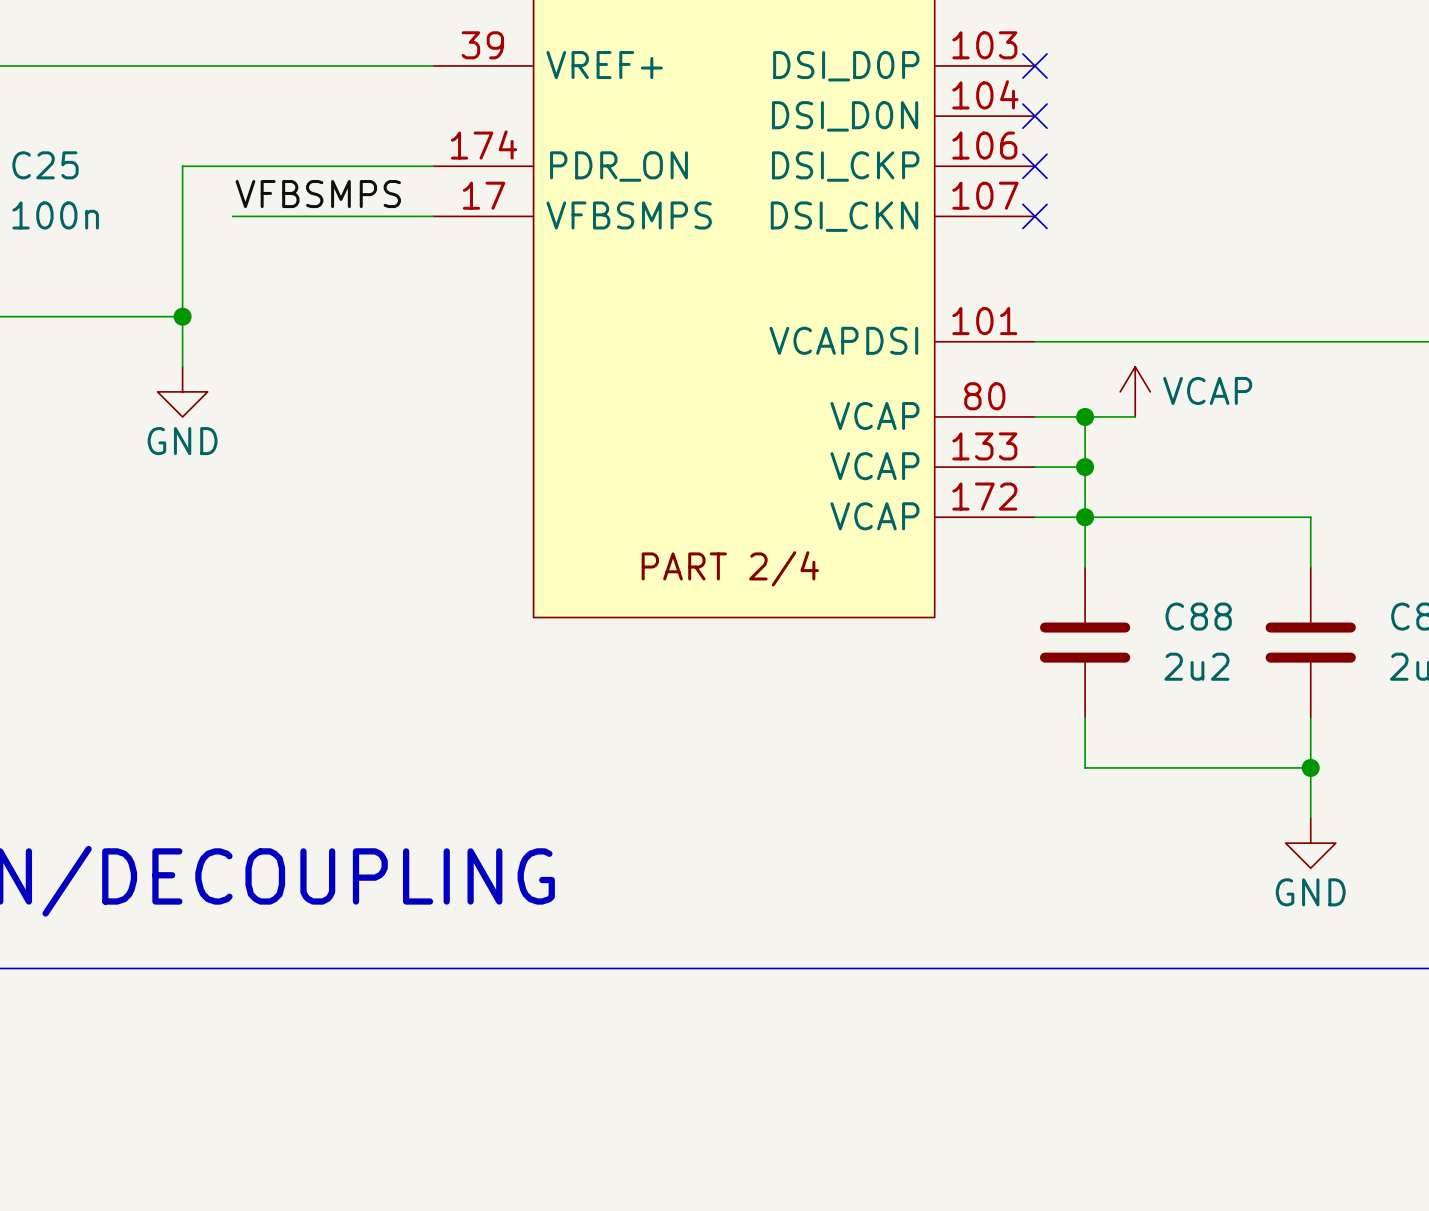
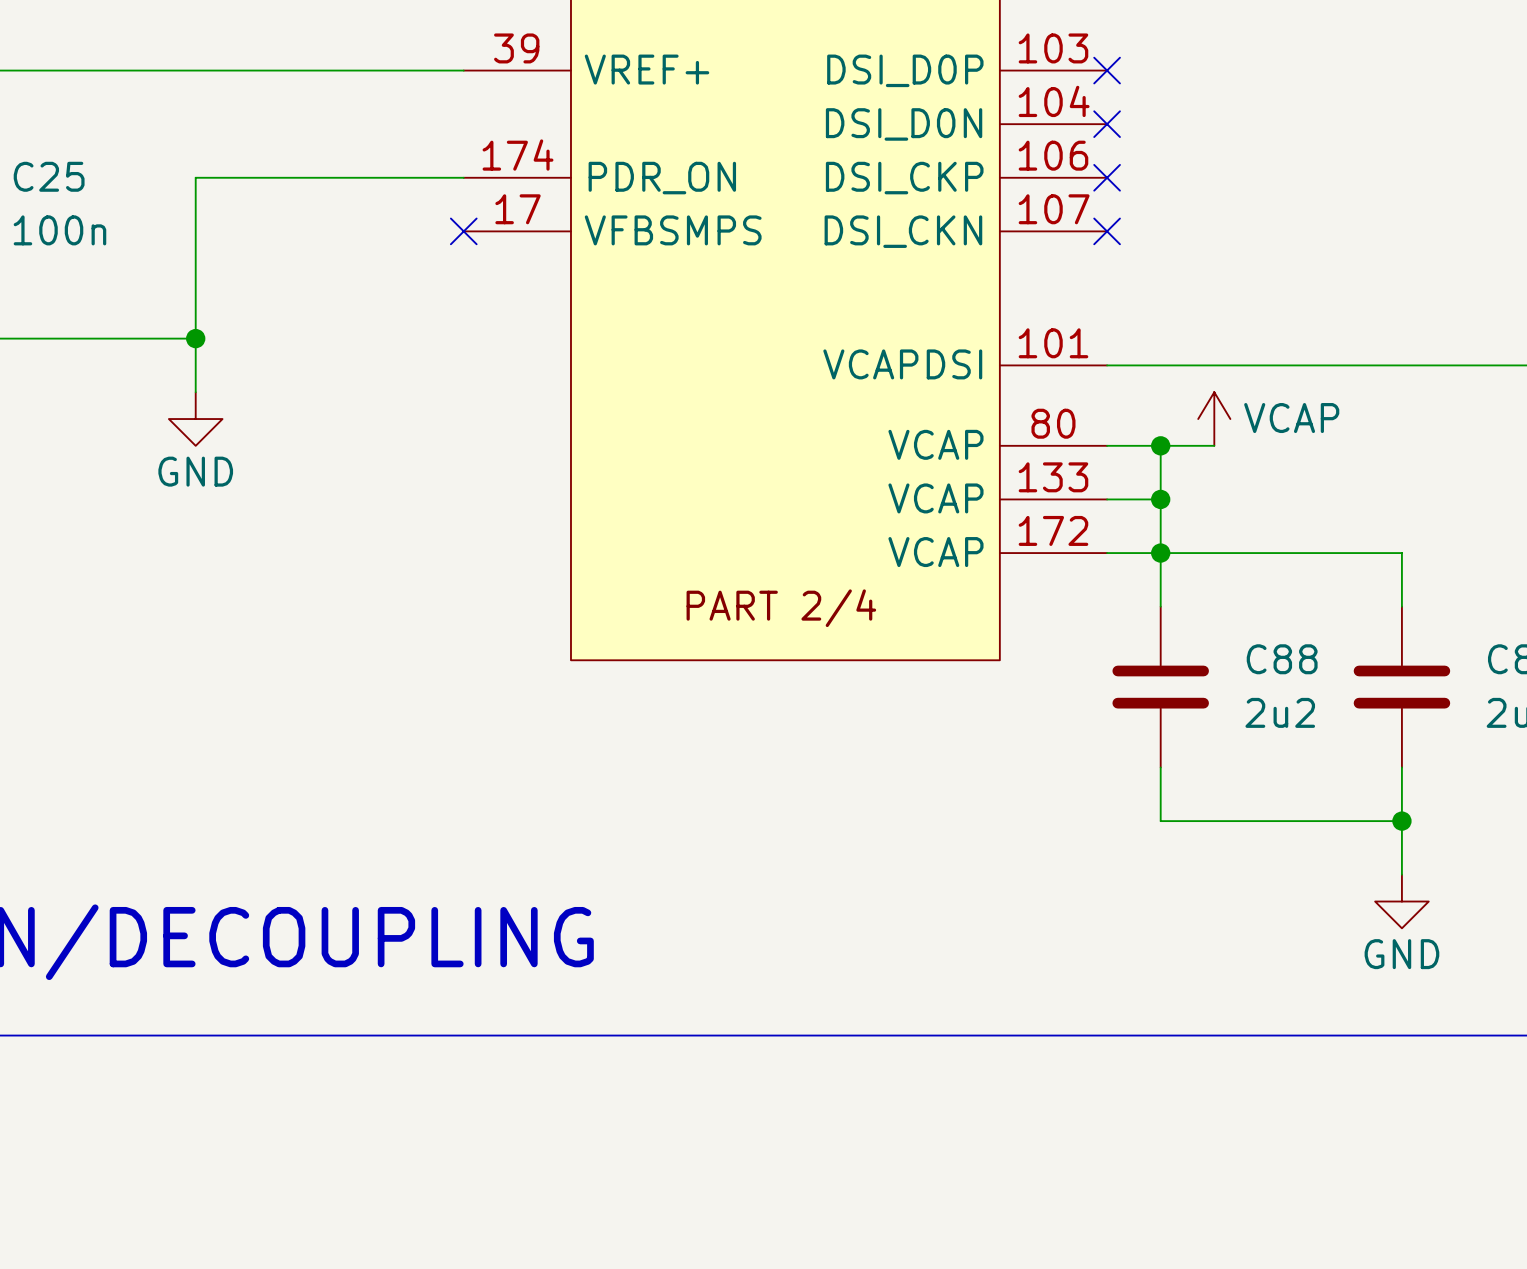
label: VFBSMPS (318, 194) -> none
wire: (232, 216) (433, 216) -> none
no-connect mark: none -> (463, 231)

